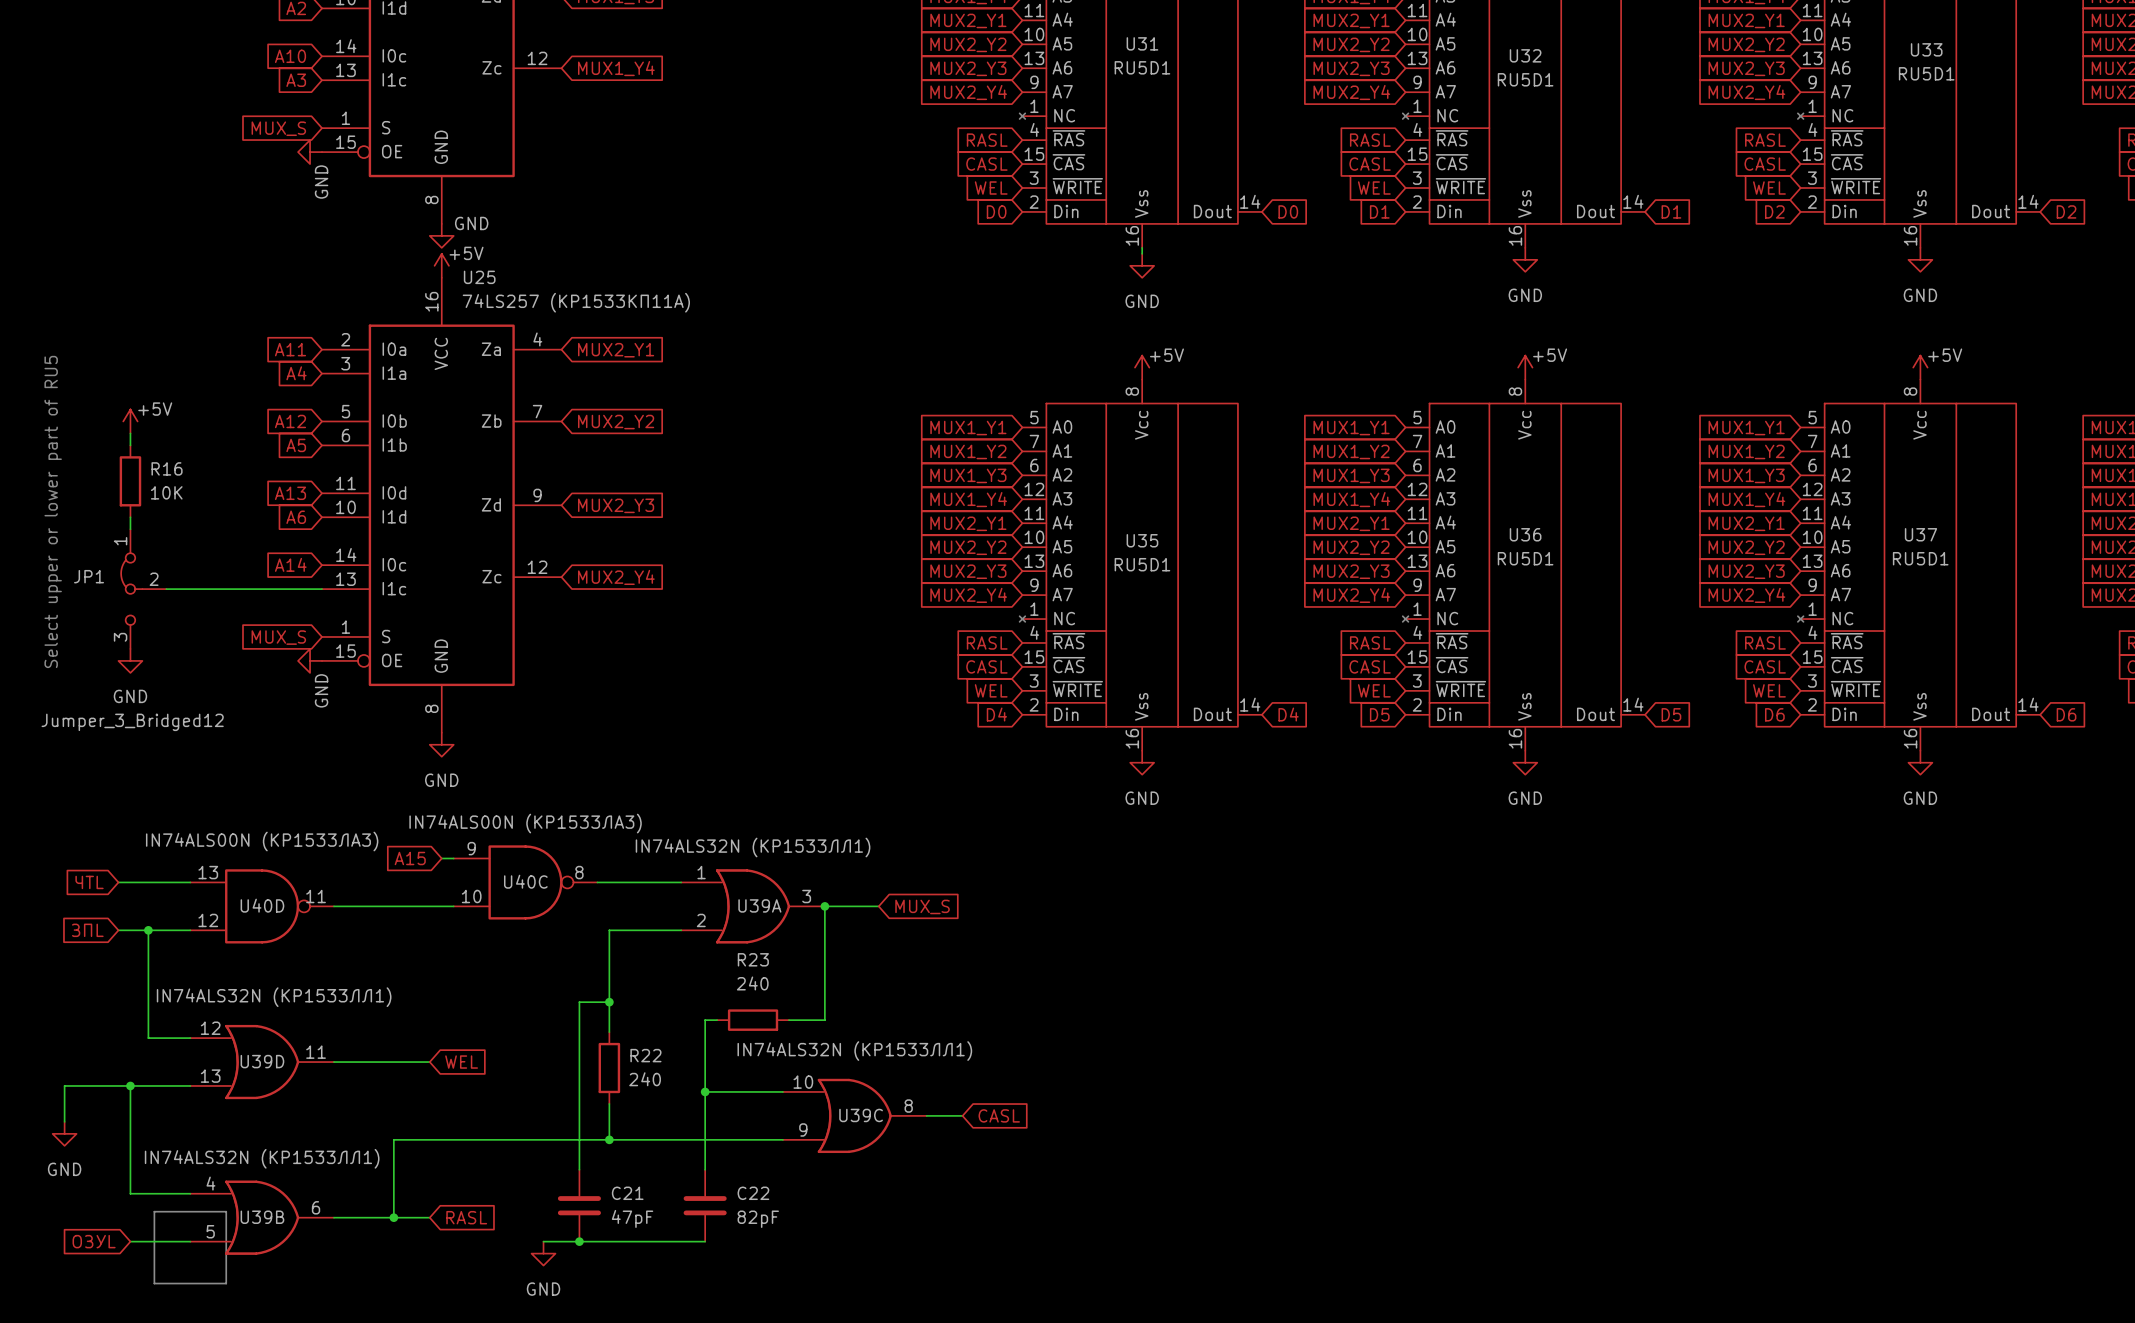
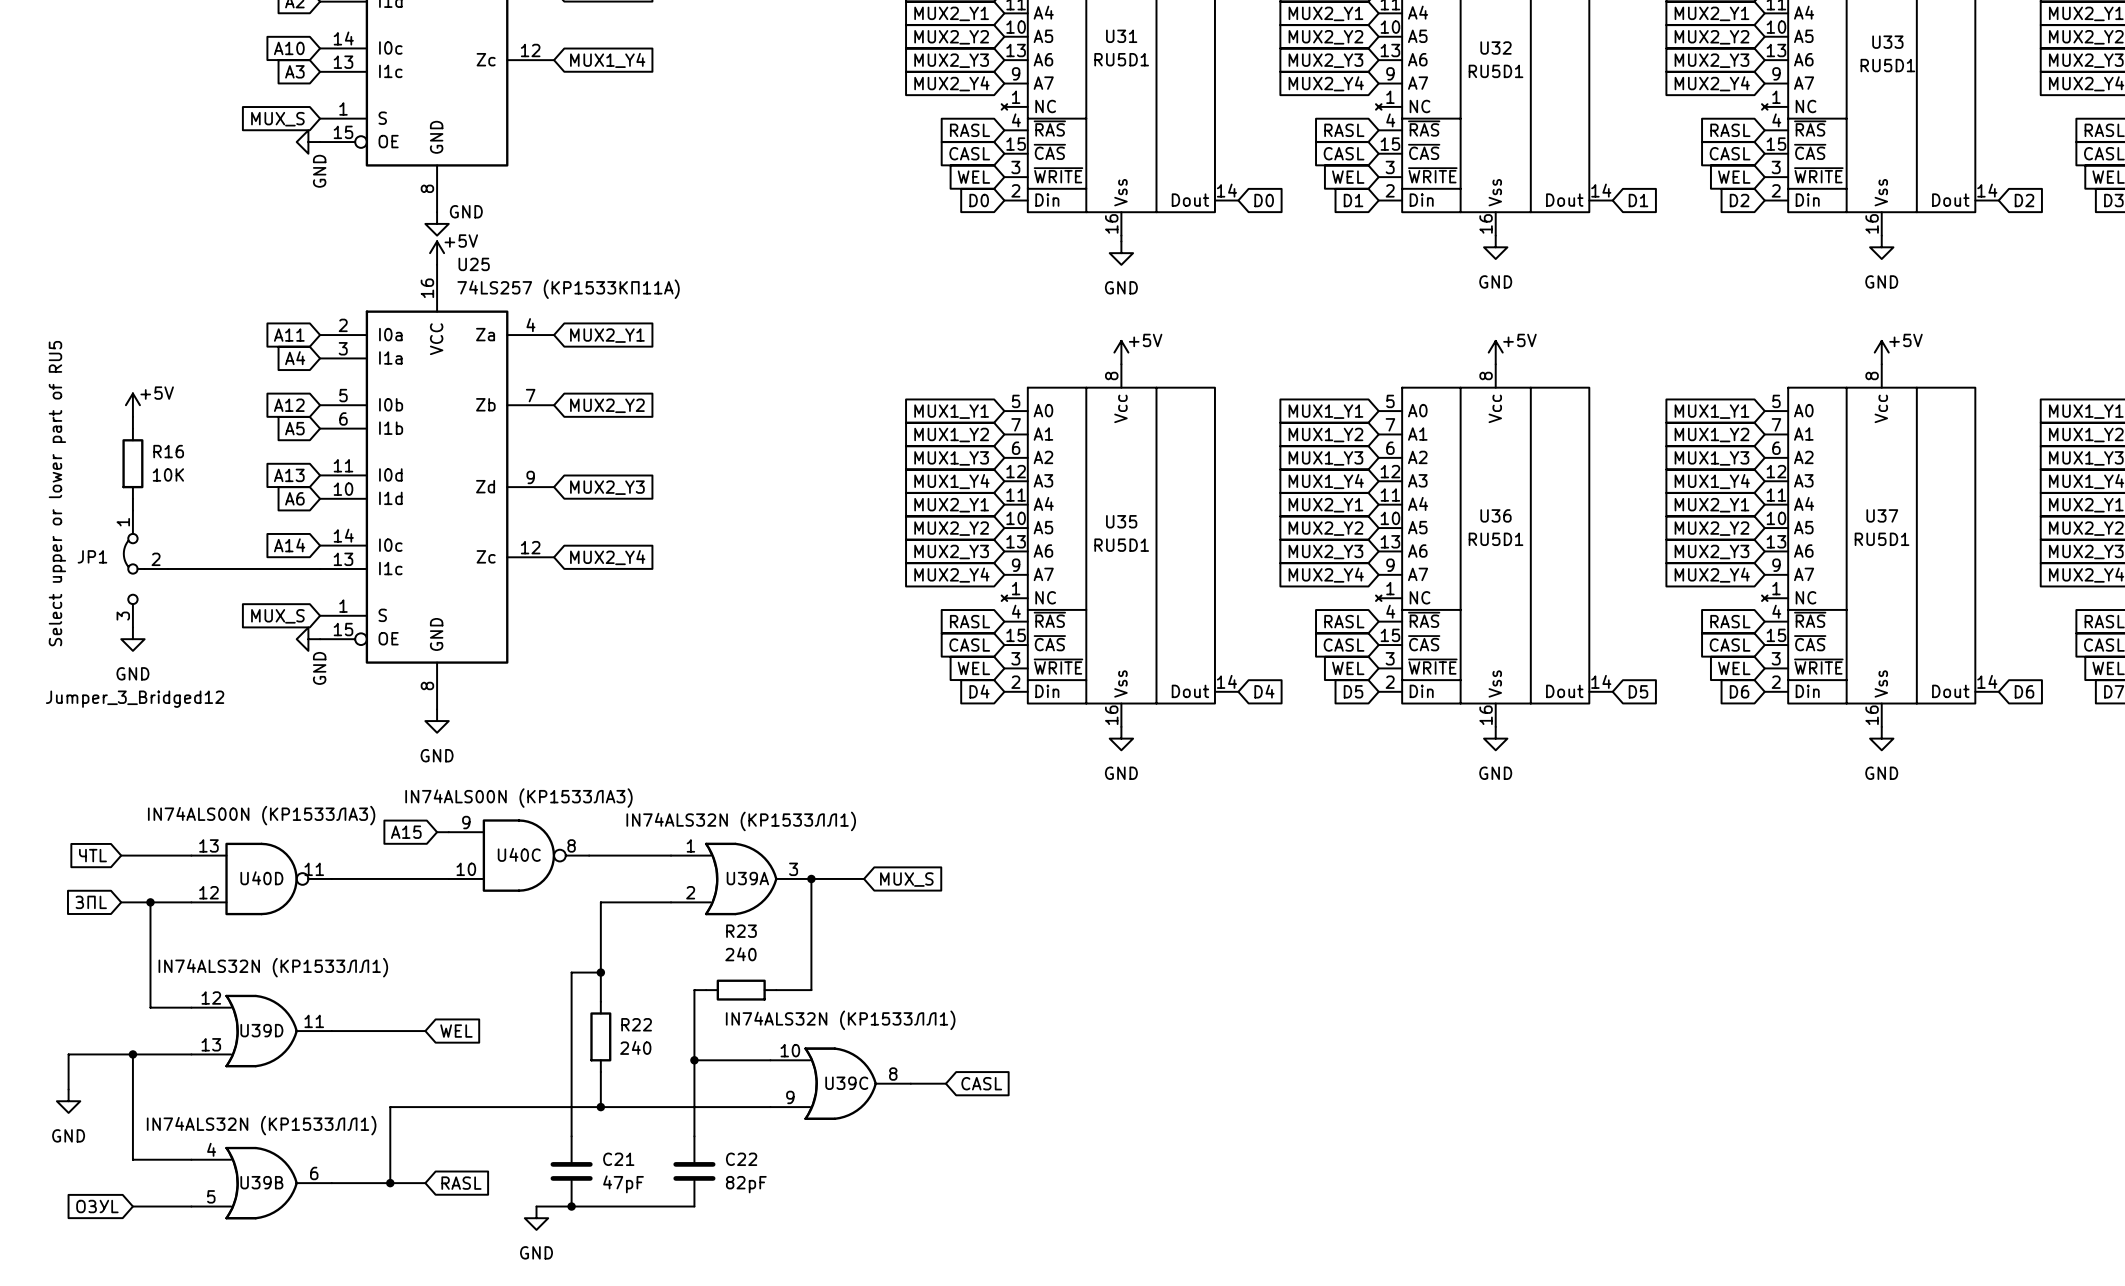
line: (154, 1211) (226, 1211) (226, 1283) (154, 1283) (154, 1211) -> none

